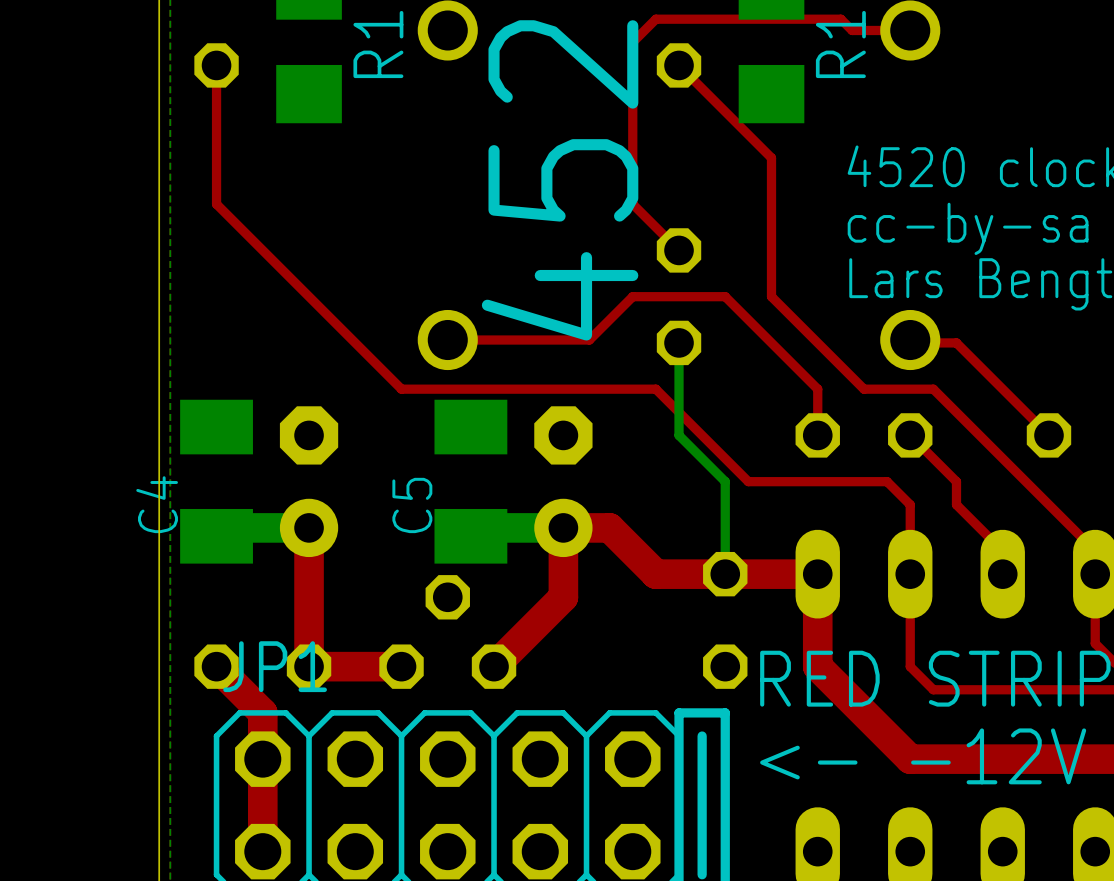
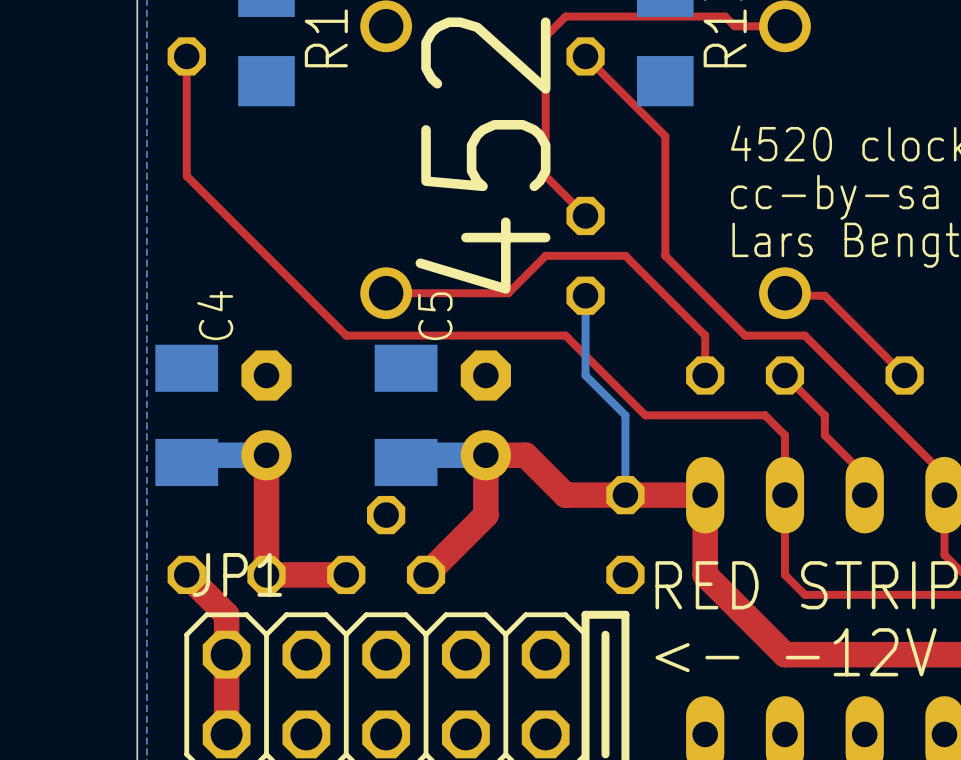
C4 name position: C4 (157, 504) -> C4 (215, 315)
C5 name position: C5 (412, 505) -> C5 (435, 316)

